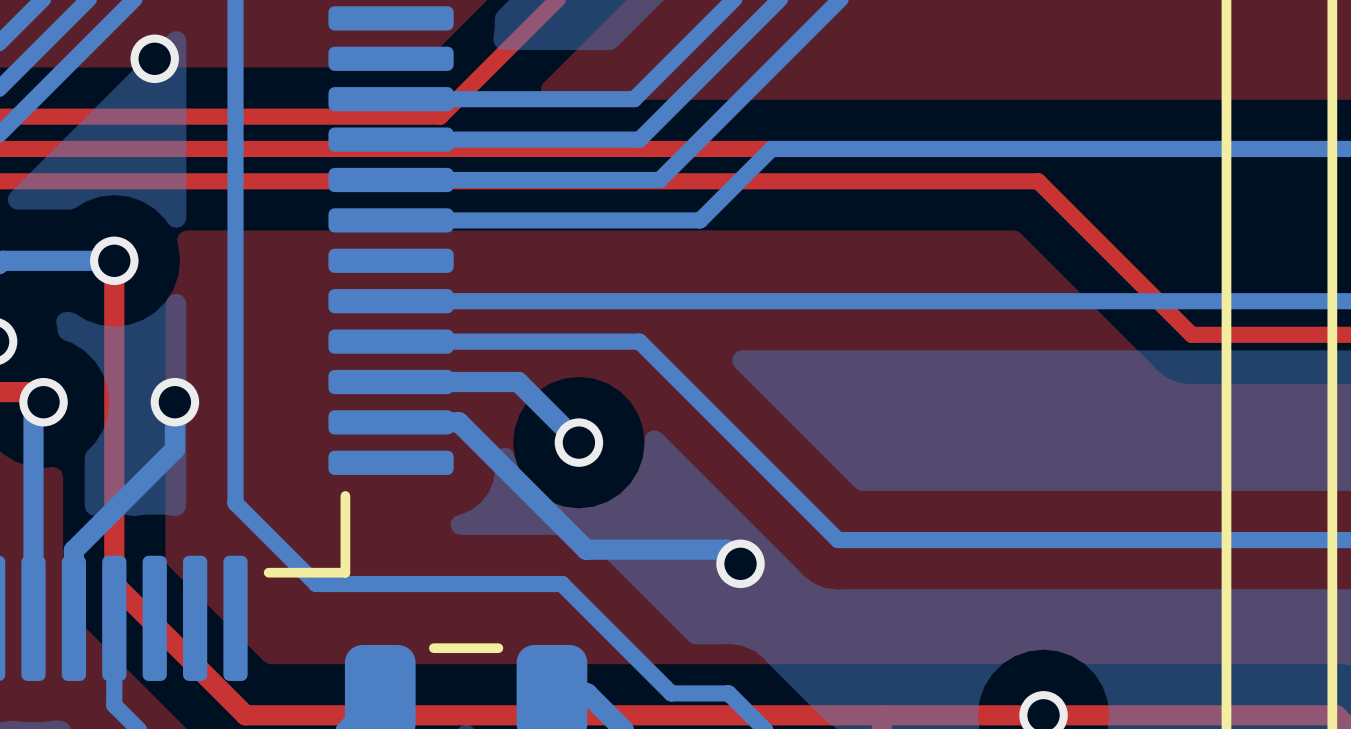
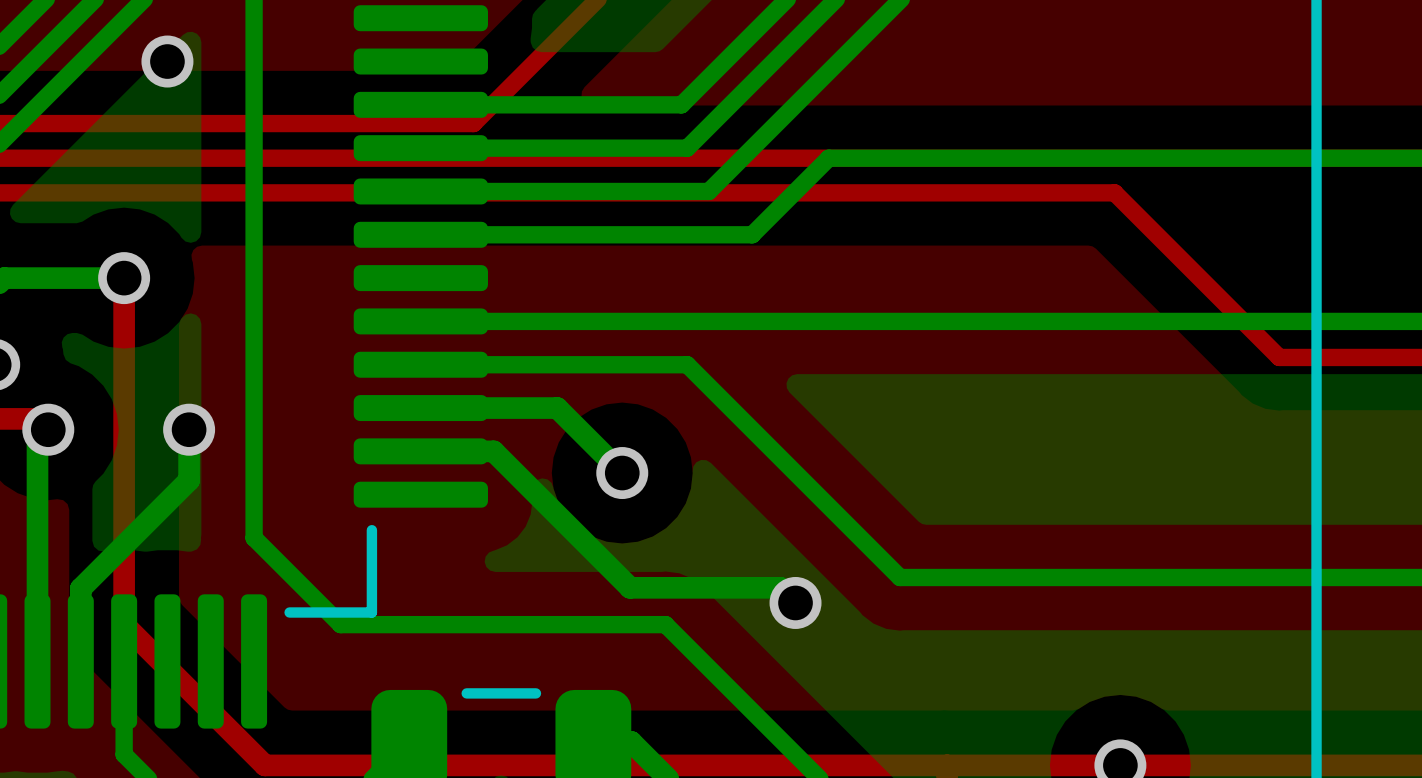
bottom track: (561, 584) (671, 693) (728, 693) -> (604, 624) (665, 624) (782, 741)

